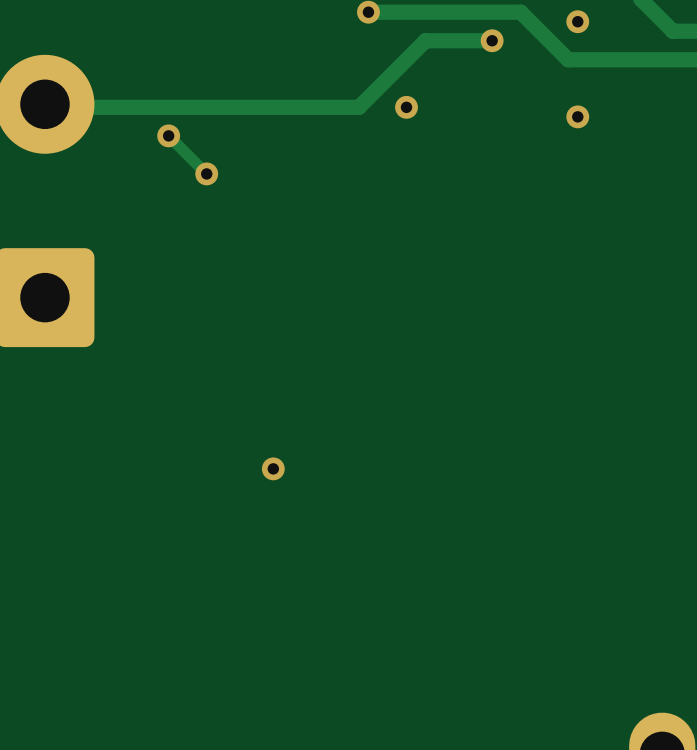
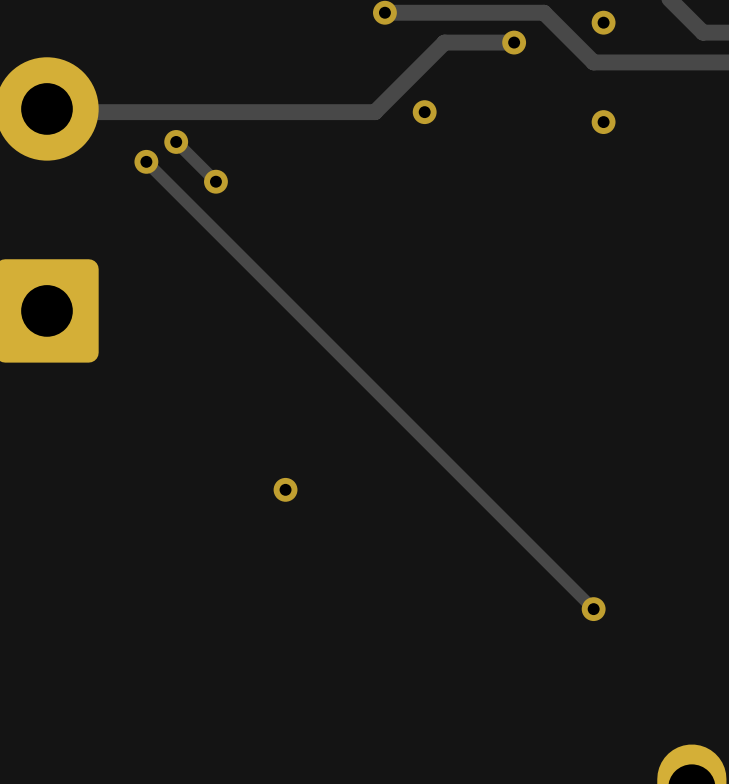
track: none -> (146, 161) (593, 609)
via: none -> (146, 161)
via: none -> (593, 609)

